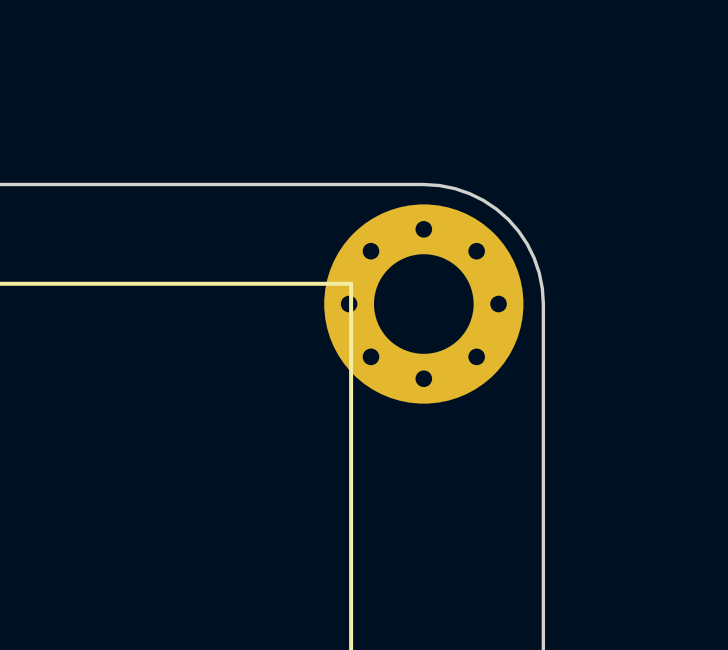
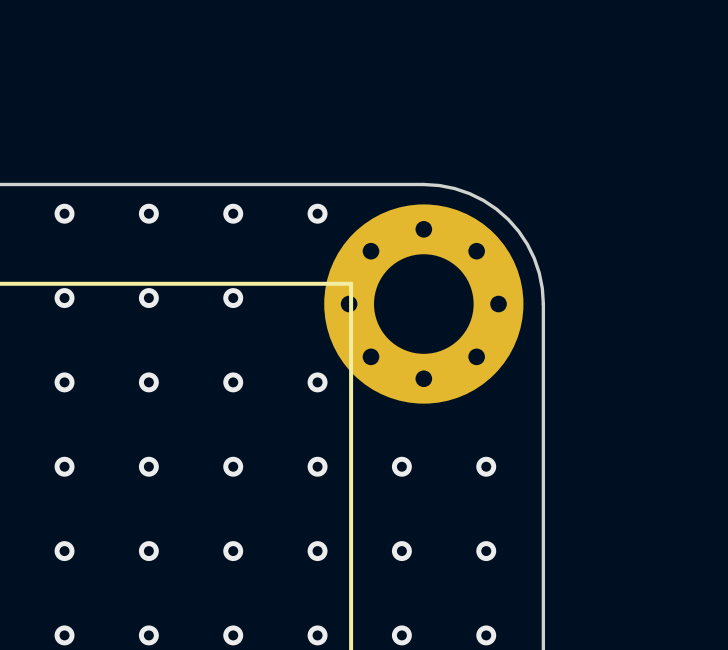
via: none -> (64, 213)
via: none -> (148, 213)
via: none -> (233, 213)
via: none -> (317, 213)
via: none -> (64, 298)
via: none -> (148, 298)
via: none -> (233, 298)
via: none -> (64, 382)
via: none -> (148, 382)
via: none -> (233, 382)
via: none -> (317, 382)
via: none -> (64, 466)
via: none -> (148, 466)
via: none -> (233, 466)
via: none -> (317, 466)
via: none -> (401, 466)
via: none -> (486, 466)
via: none -> (64, 551)
via: none -> (148, 551)
via: none -> (233, 551)
via: none -> (317, 551)
via: none -> (401, 551)
via: none -> (486, 551)
via: none -> (64, 635)
via: none -> (148, 635)
via: none -> (233, 635)
via: none -> (317, 635)
via: none -> (401, 635)
via: none -> (486, 635)

